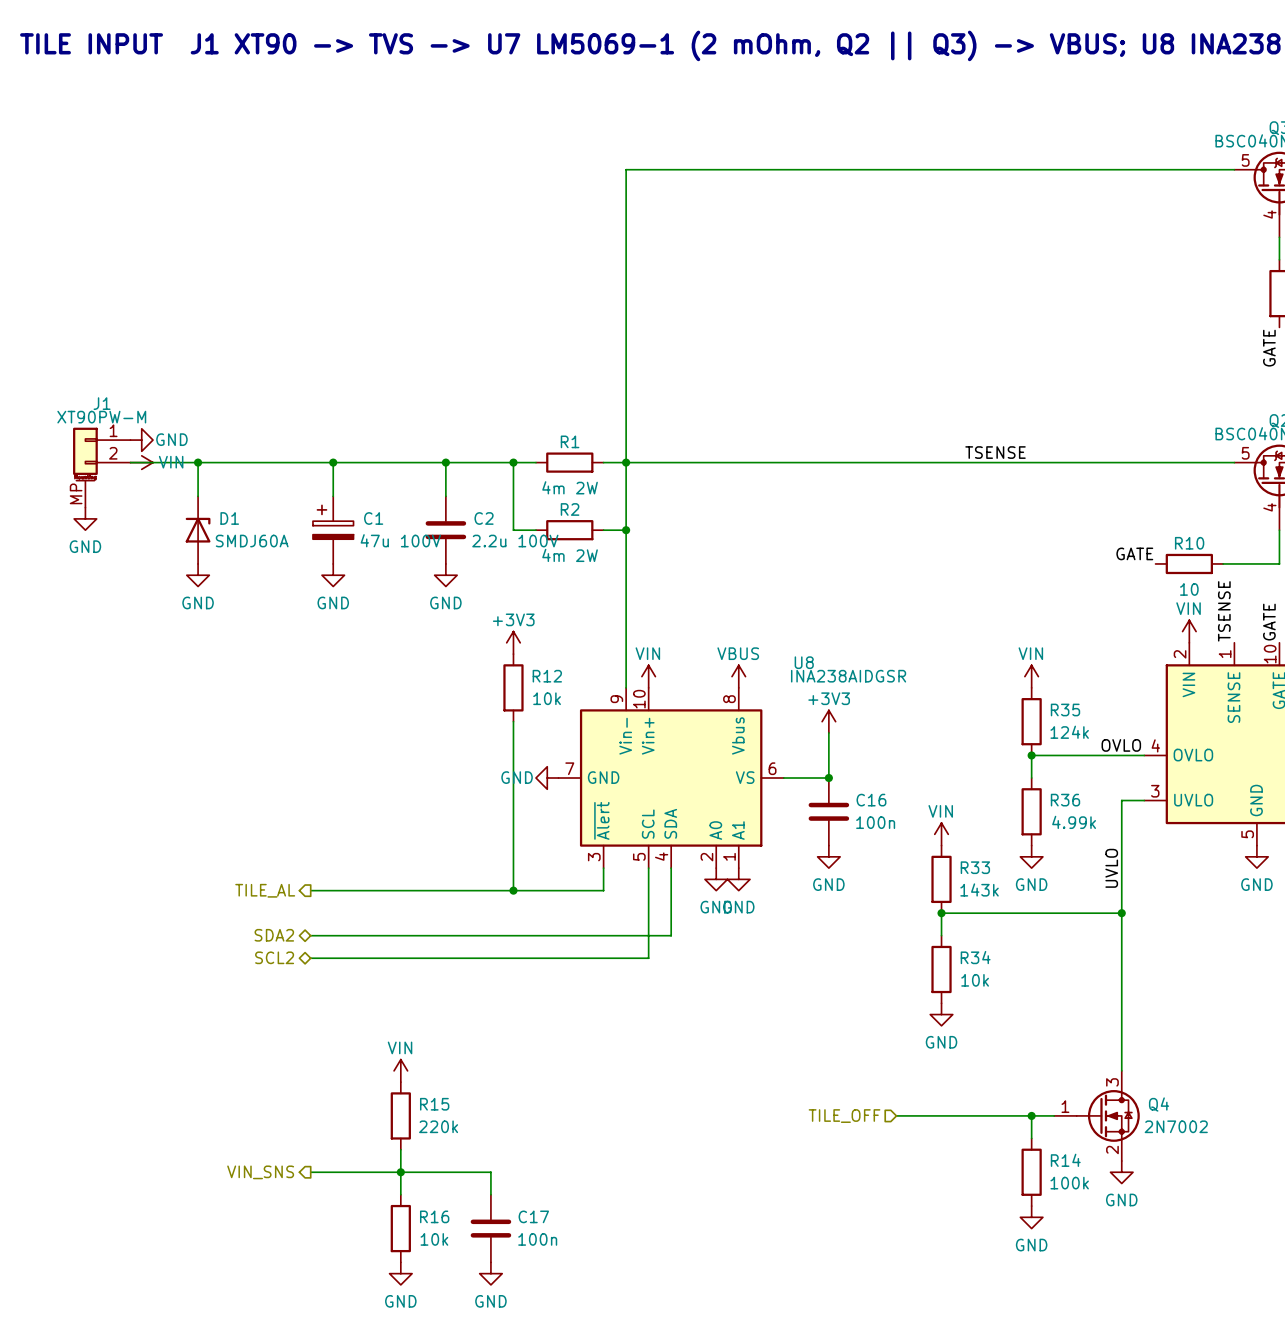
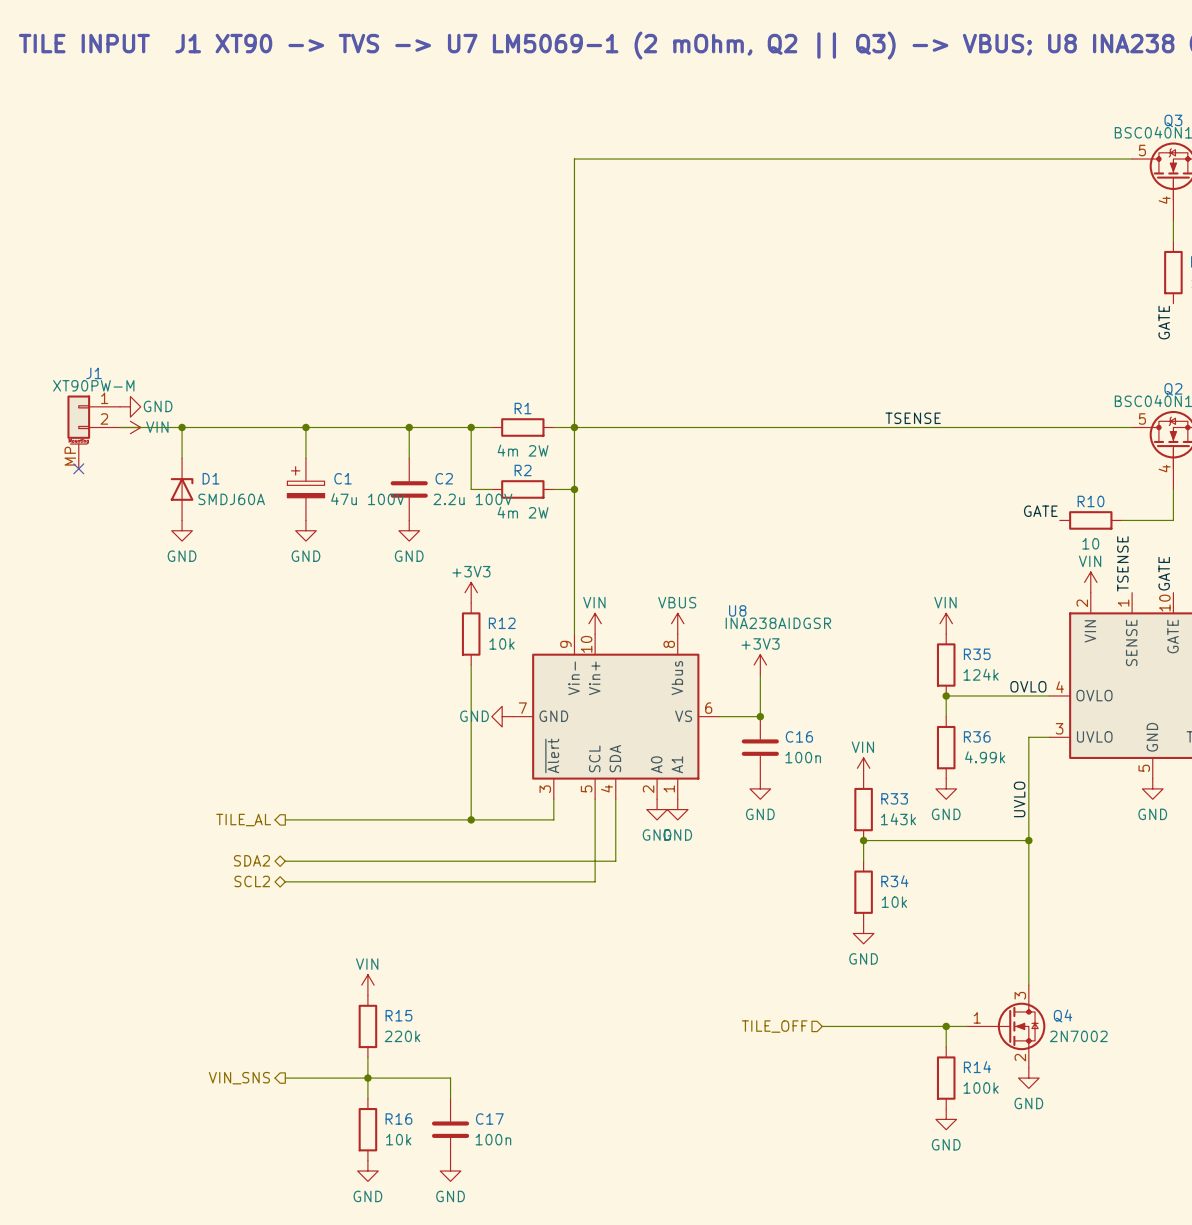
no-connect mark: none -> (78, 468)
power symbol: GND (85, 518) -> none

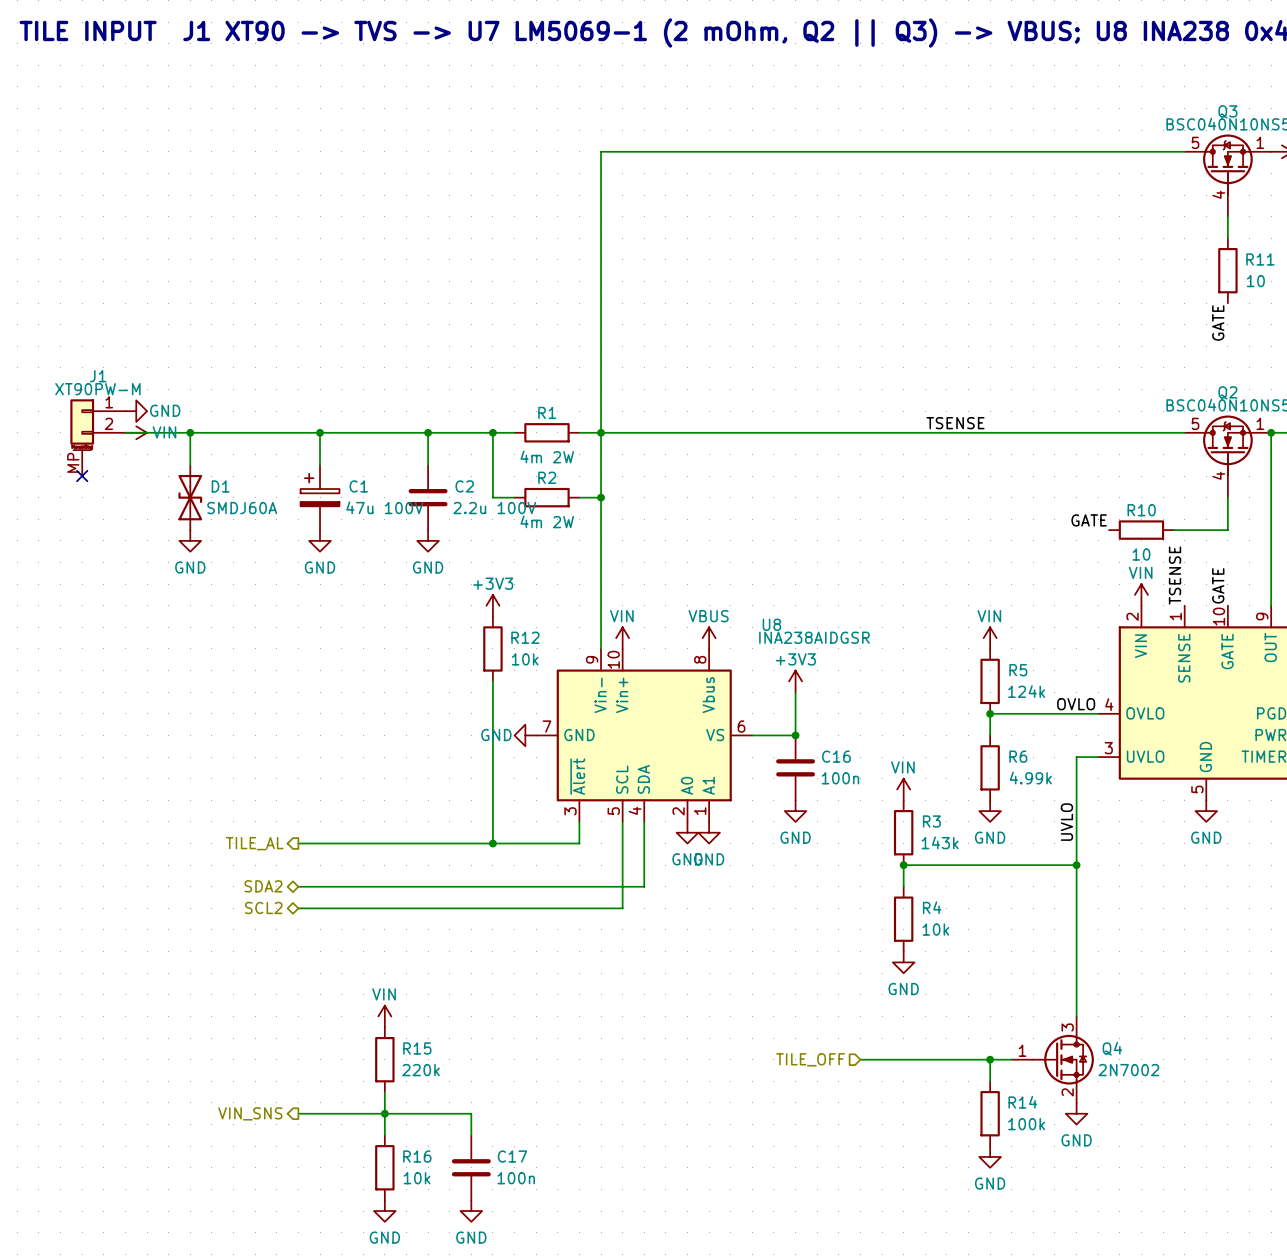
D1 symbol: [170, 458, 194, 521] -> [178, 465, 203, 531]
R35 name: R35 (977, 654) -> R5 (1018, 670)
R36 name: R36 (977, 736) -> R6 (1018, 756)
R33 name: R33 (894, 798) -> R3 (931, 821)
R34 name: R34 (894, 881) -> R4 (932, 907)

